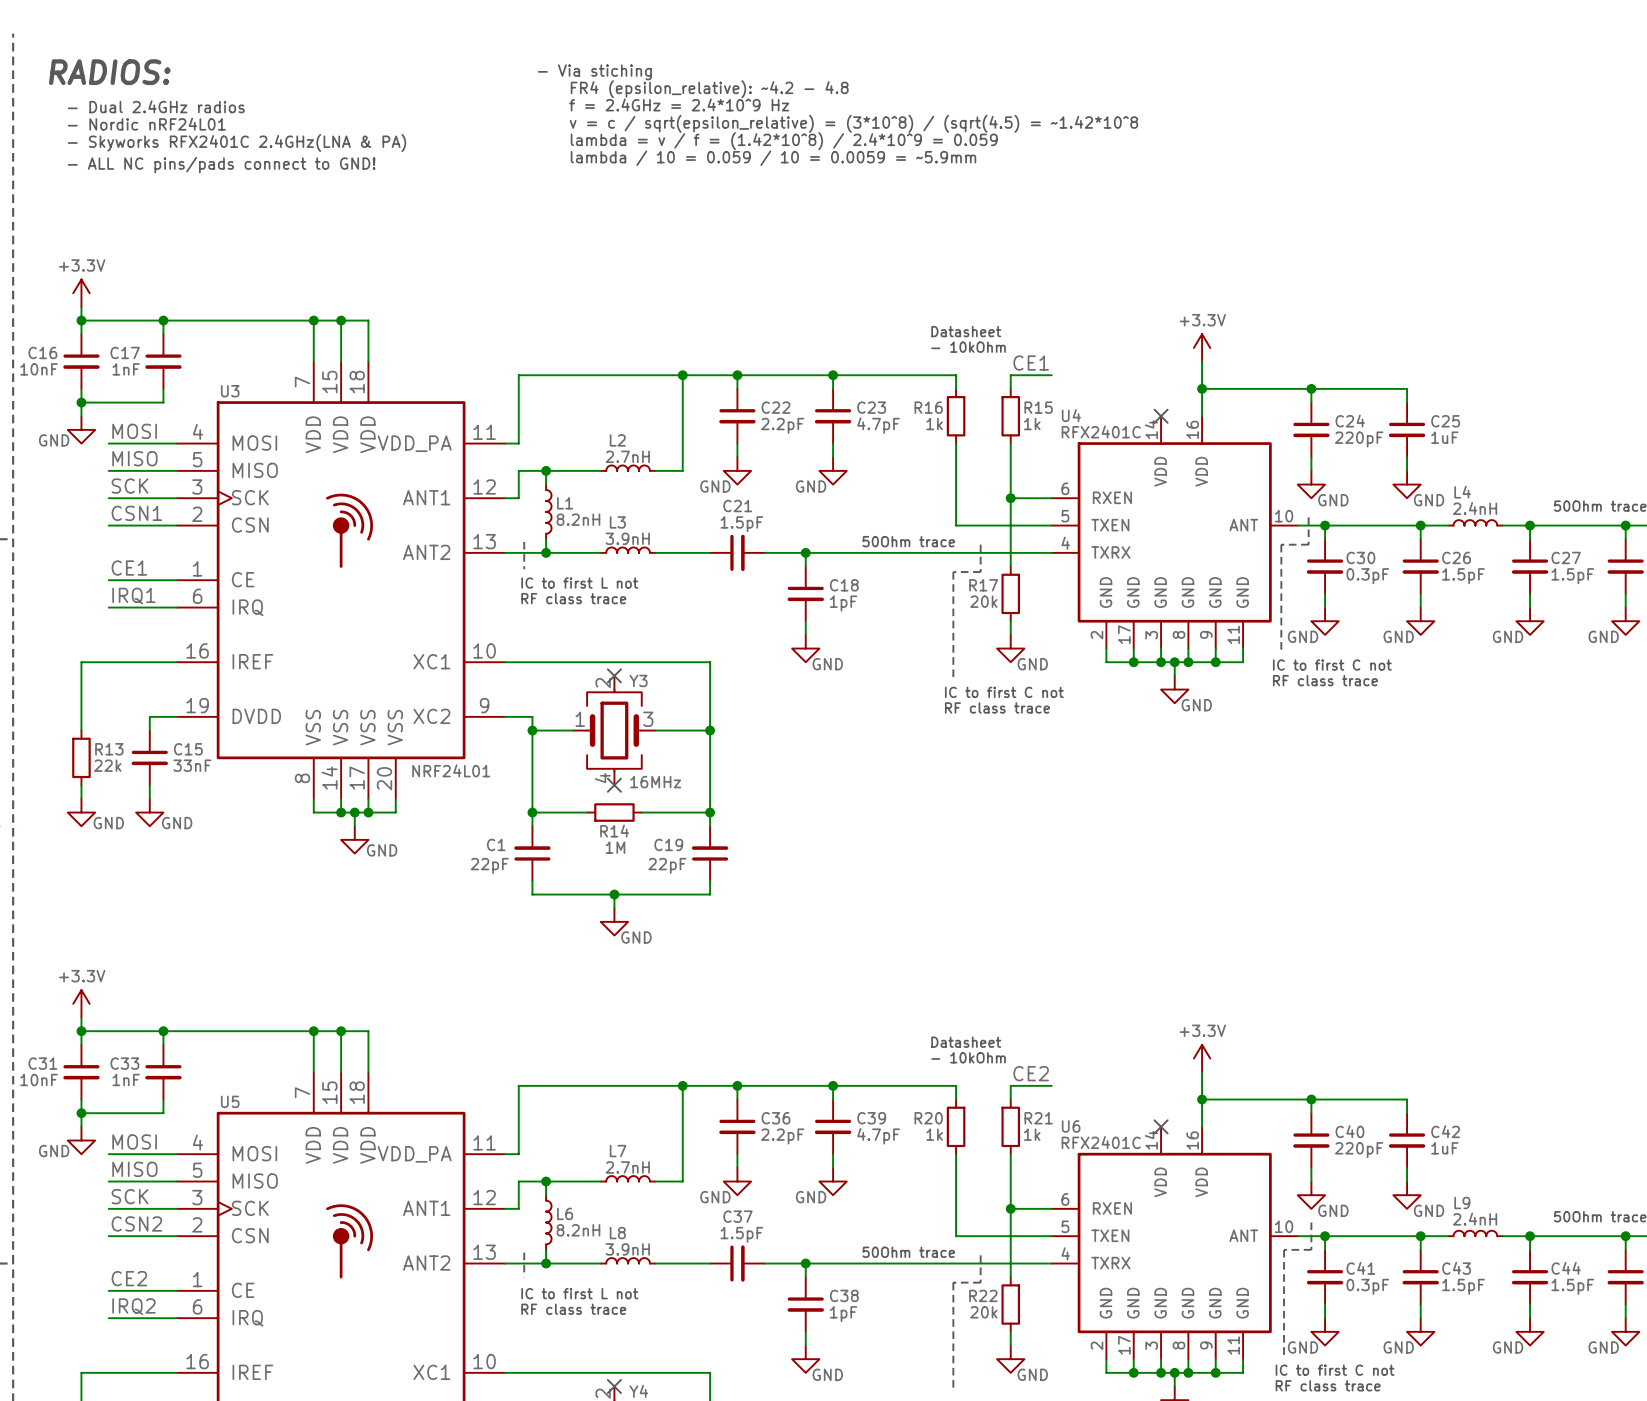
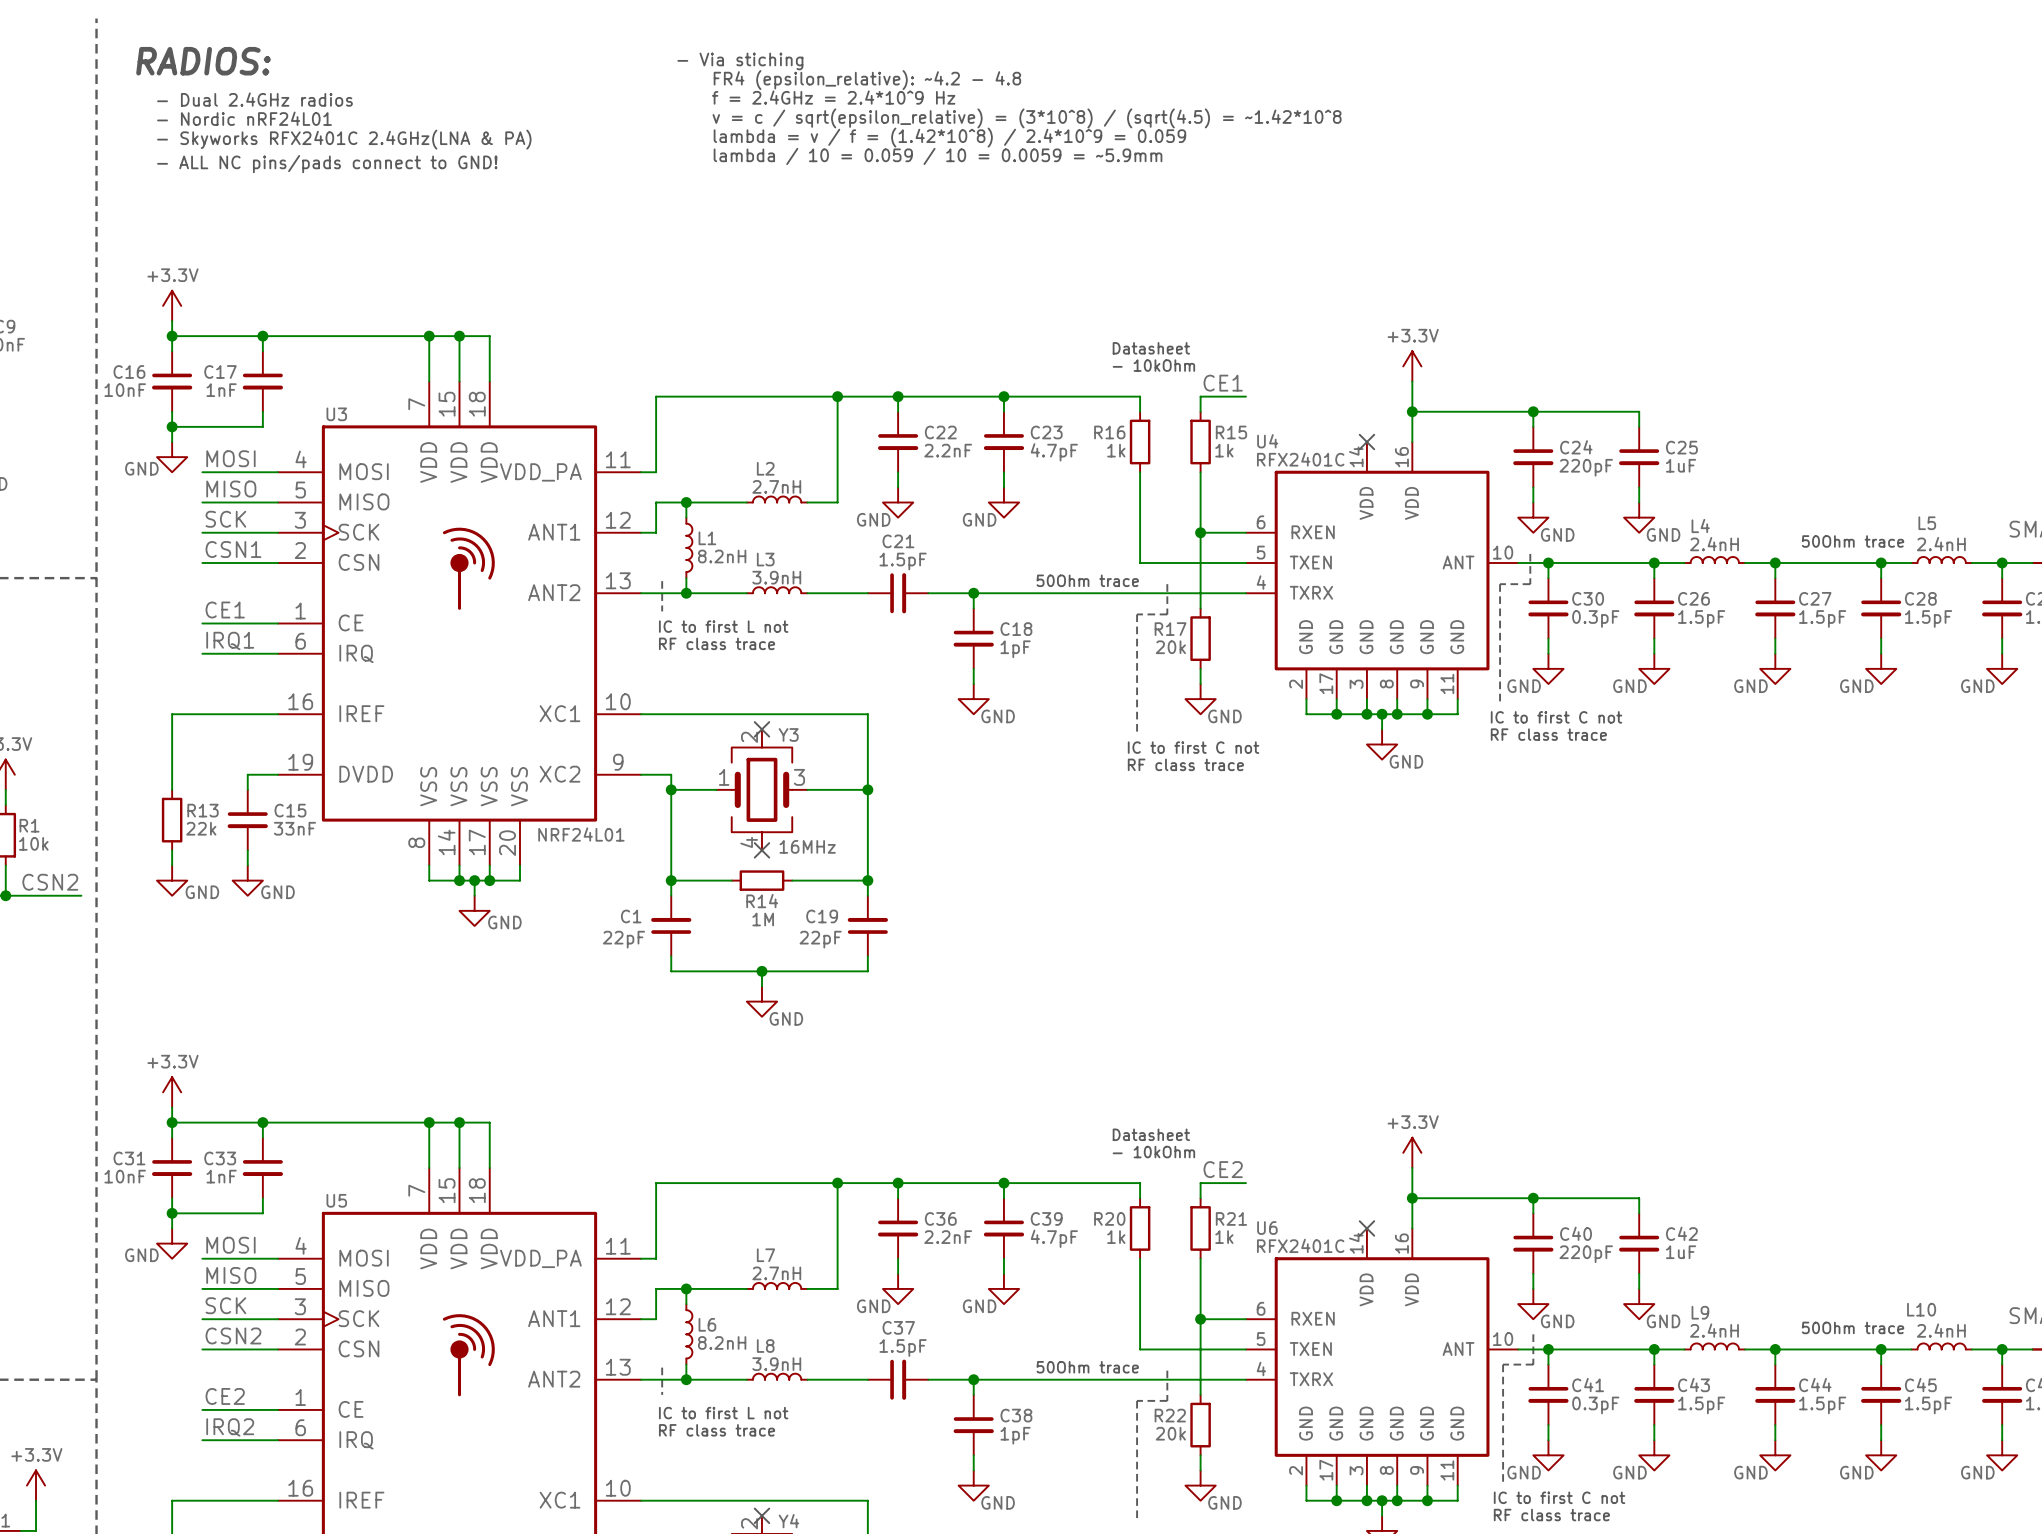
C22 value: 2.2pF (782, 425) -> 2.2nF (948, 450)
C36 value: 2.2pF (782, 1136) -> 2.2nF (948, 1237)

